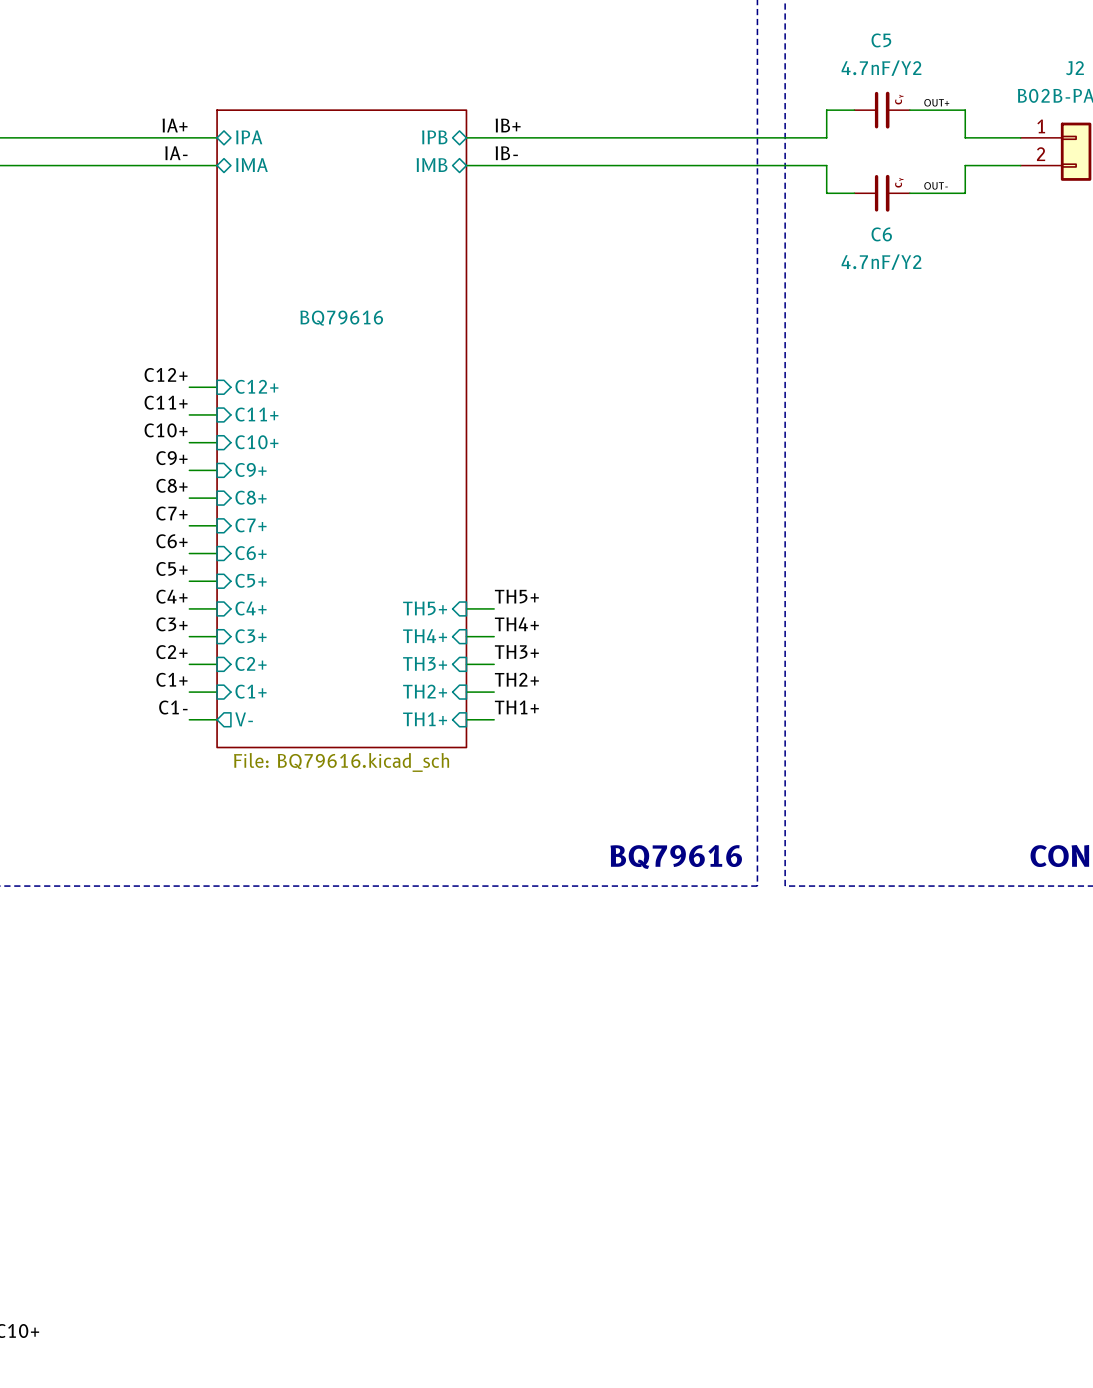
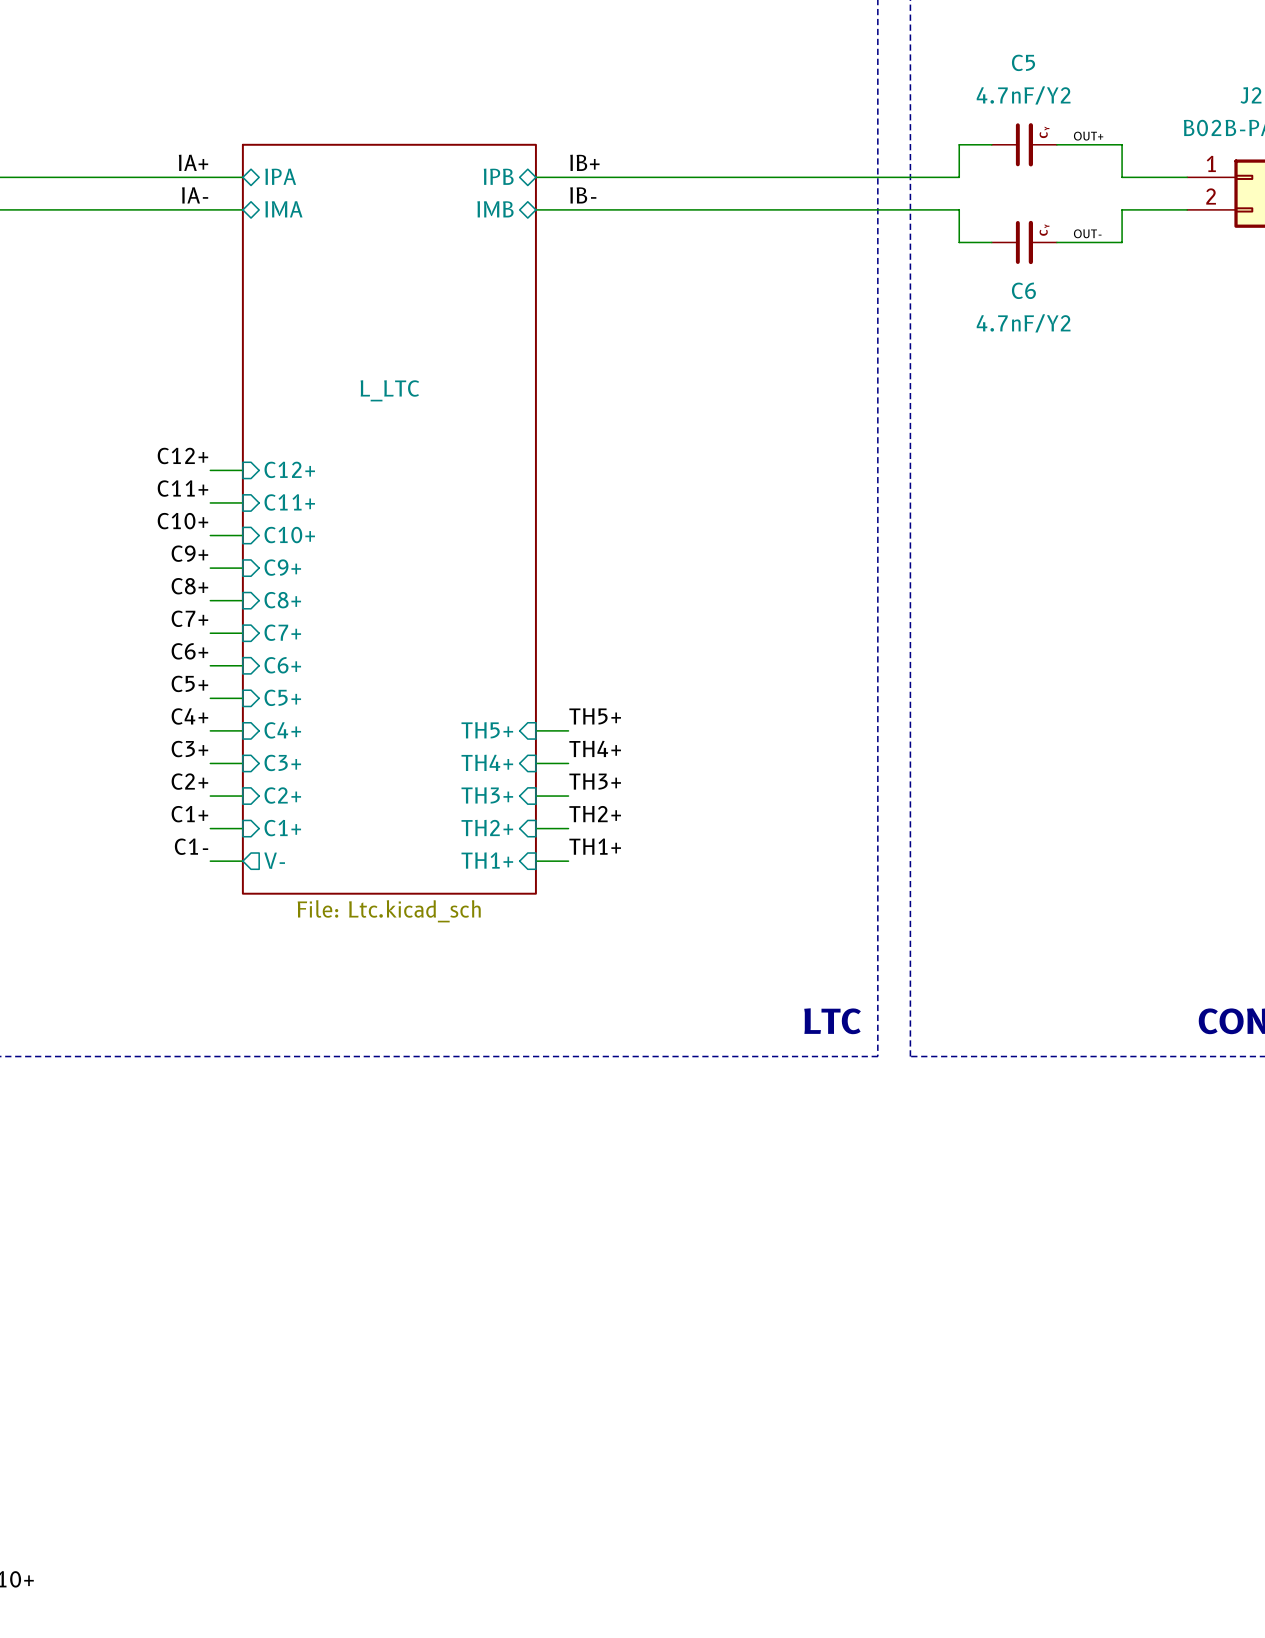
sheet BQ79616 name: BQ79616 (341, 318) -> L_LTC (389, 390)
sheet BQ79616 value: File: BQ79616.kicad_sch (341, 762) -> File: Ltc.kicad_sch (389, 911)
text: BQ79616 (676, 856) -> LTC (832, 1021)

